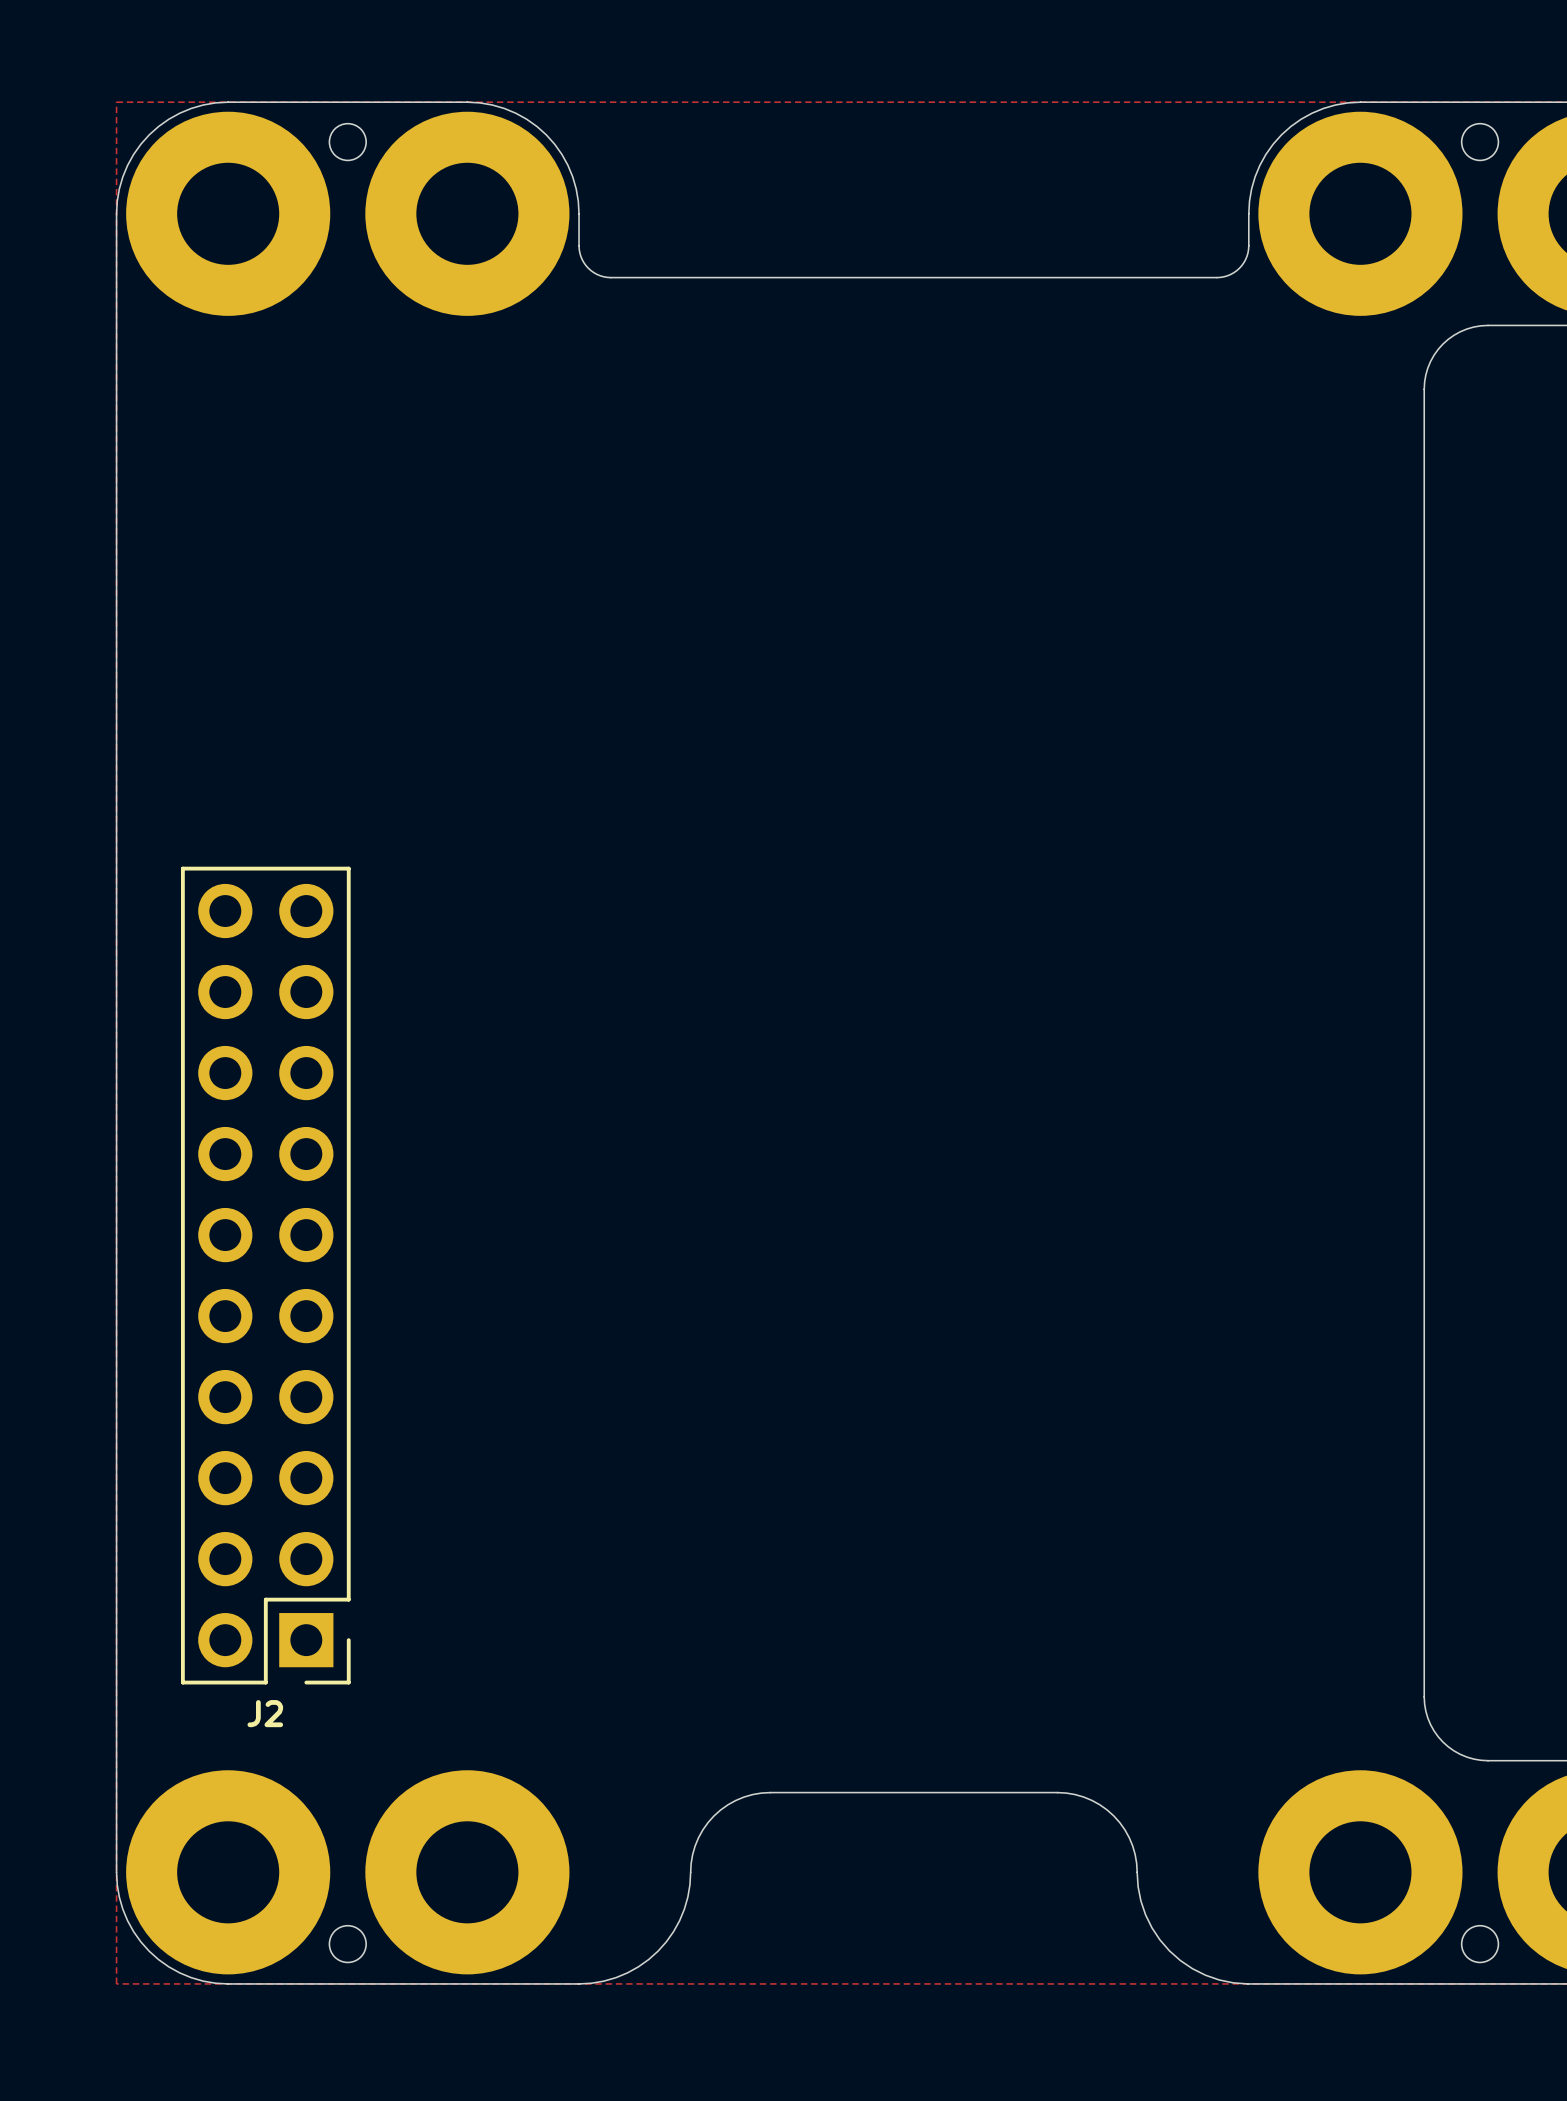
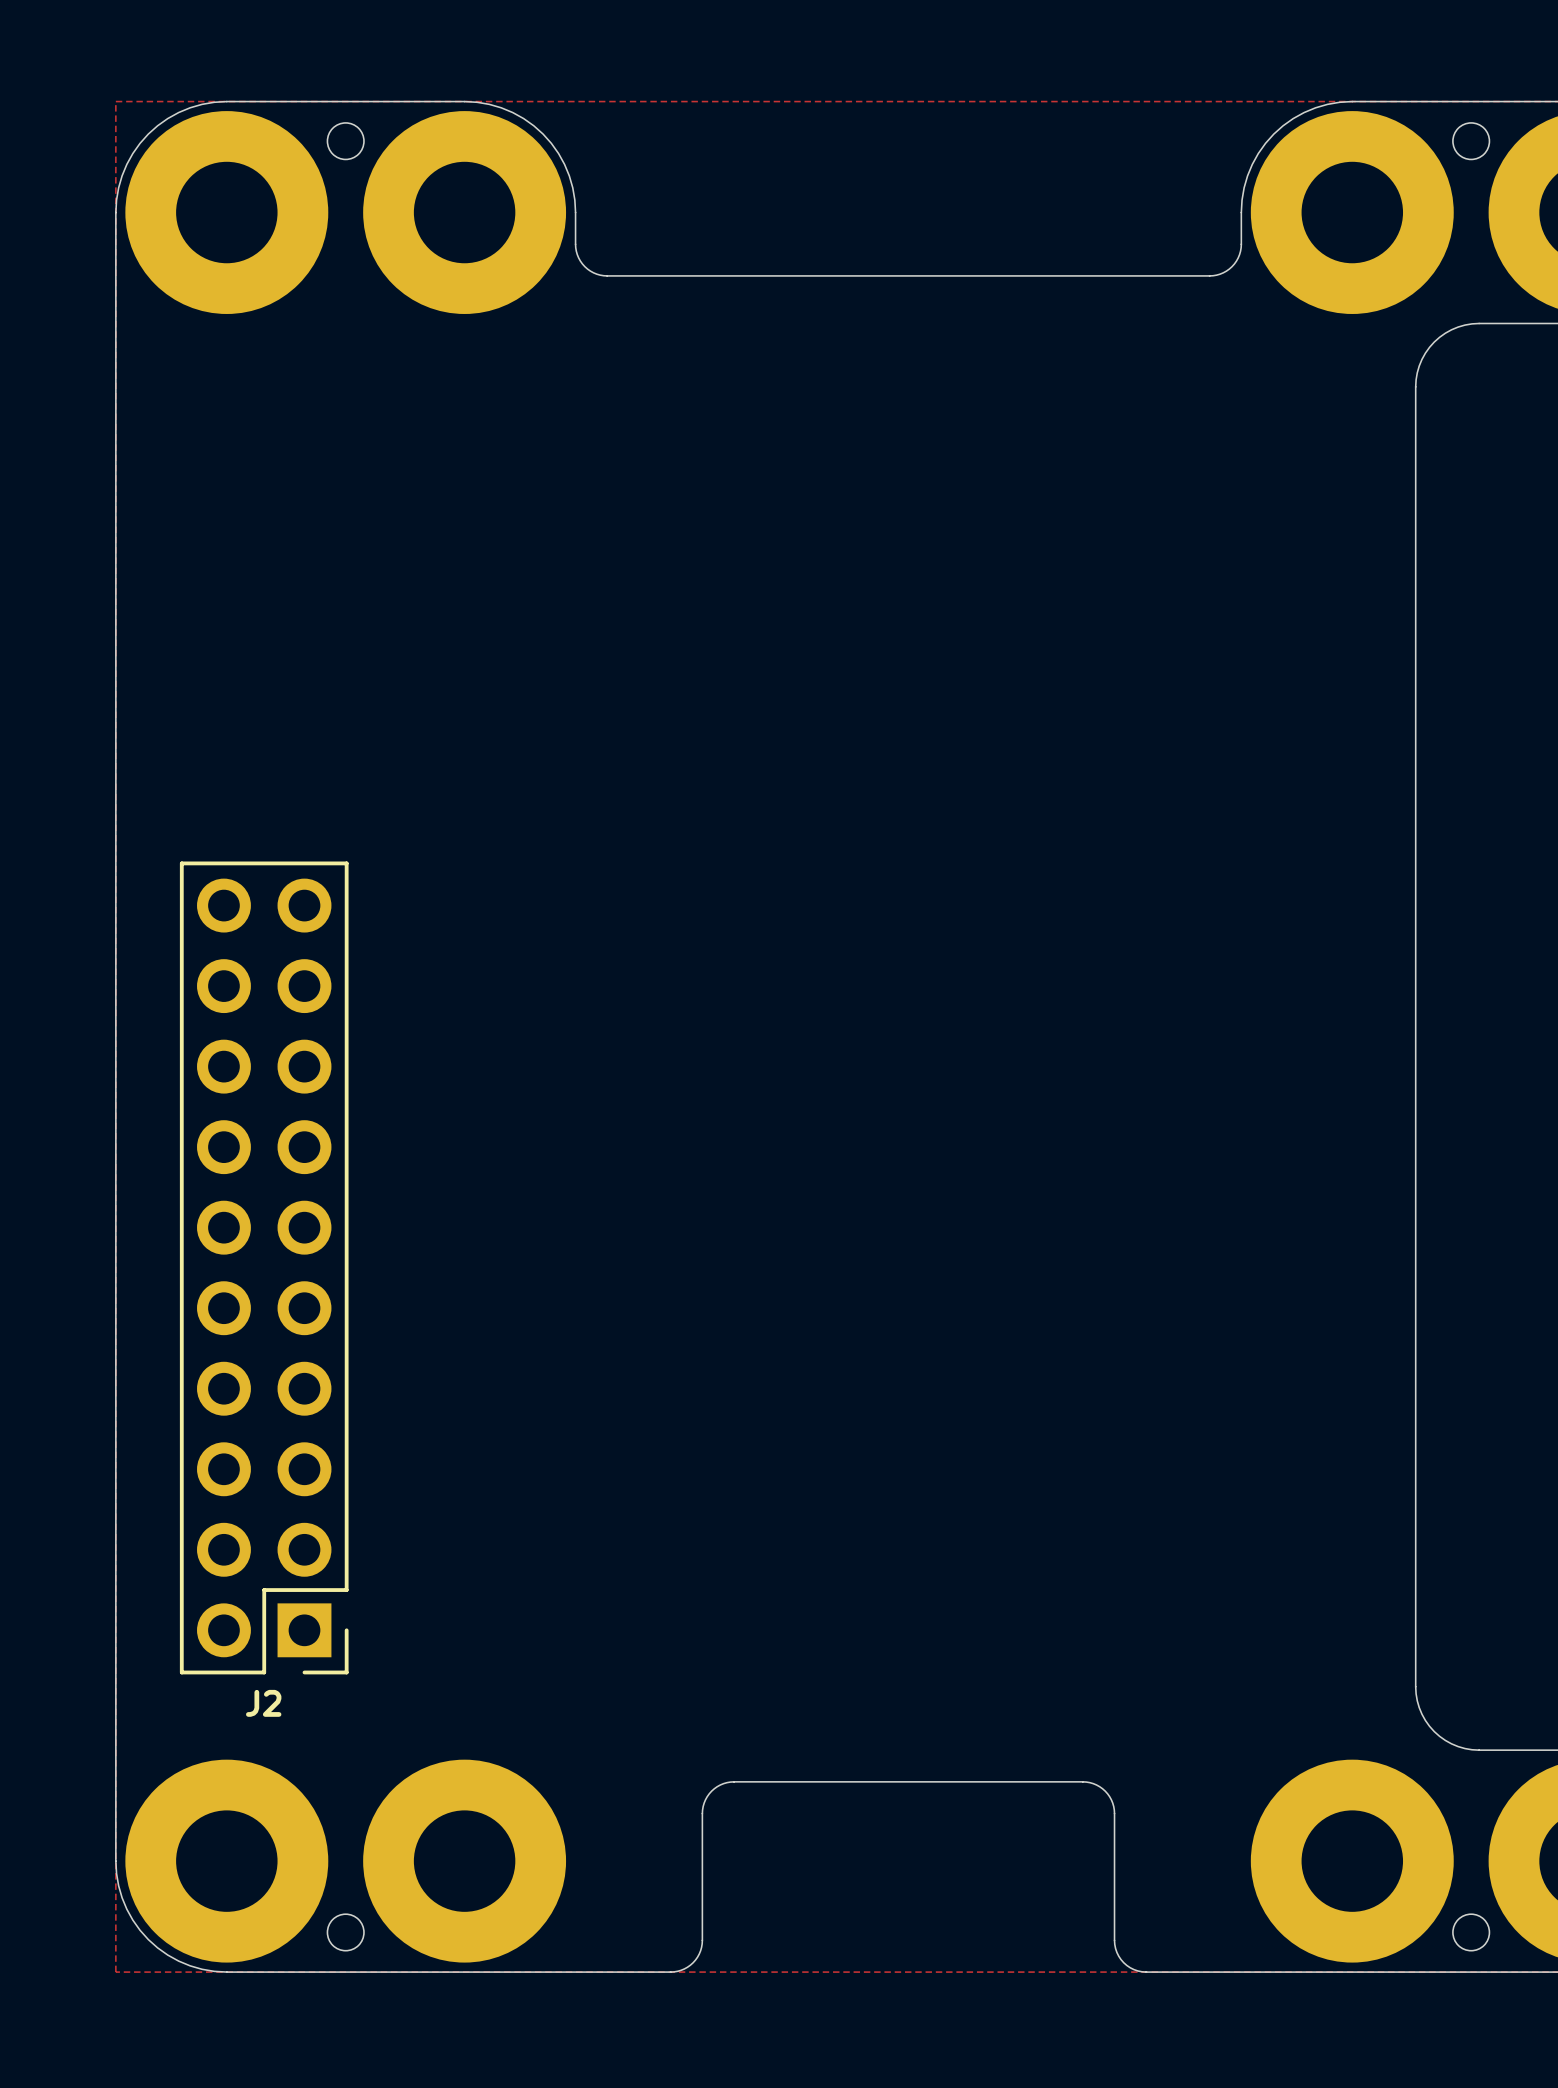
board edge: (770, 1792) (744, 1797) (727, 1804) (714, 1815) (702, 1829) (692, 1854) (689, 1884) (684, 1909) (673, 1931) (657, 1951) (627, 1972) (603, 1981) (579, 1983) -> (765, 1781) (723, 1783) (711, 1791) (704, 1803) (702, 1813) (702, 1943) (699, 1954) (693, 1962) (684, 1968) (674, 1971) (575, 1972)
board edge: (1057, 1792) (1083, 1797) (1099, 1804) (1113, 1815) (1124, 1829) (1135, 1854) (1138, 1886) (1145, 1914) (1160, 1940) (1169, 1950) (1180, 1960) (1205, 1975) (1233, 1982) (1248, 1983) -> (1051, 1781) (1093, 1783) (1105, 1791) (1112, 1803) (1114, 1813) (1114, 1944) (1116, 1952) (1123, 1962) (1133, 1969) (1141, 1971) (1240, 1972)

